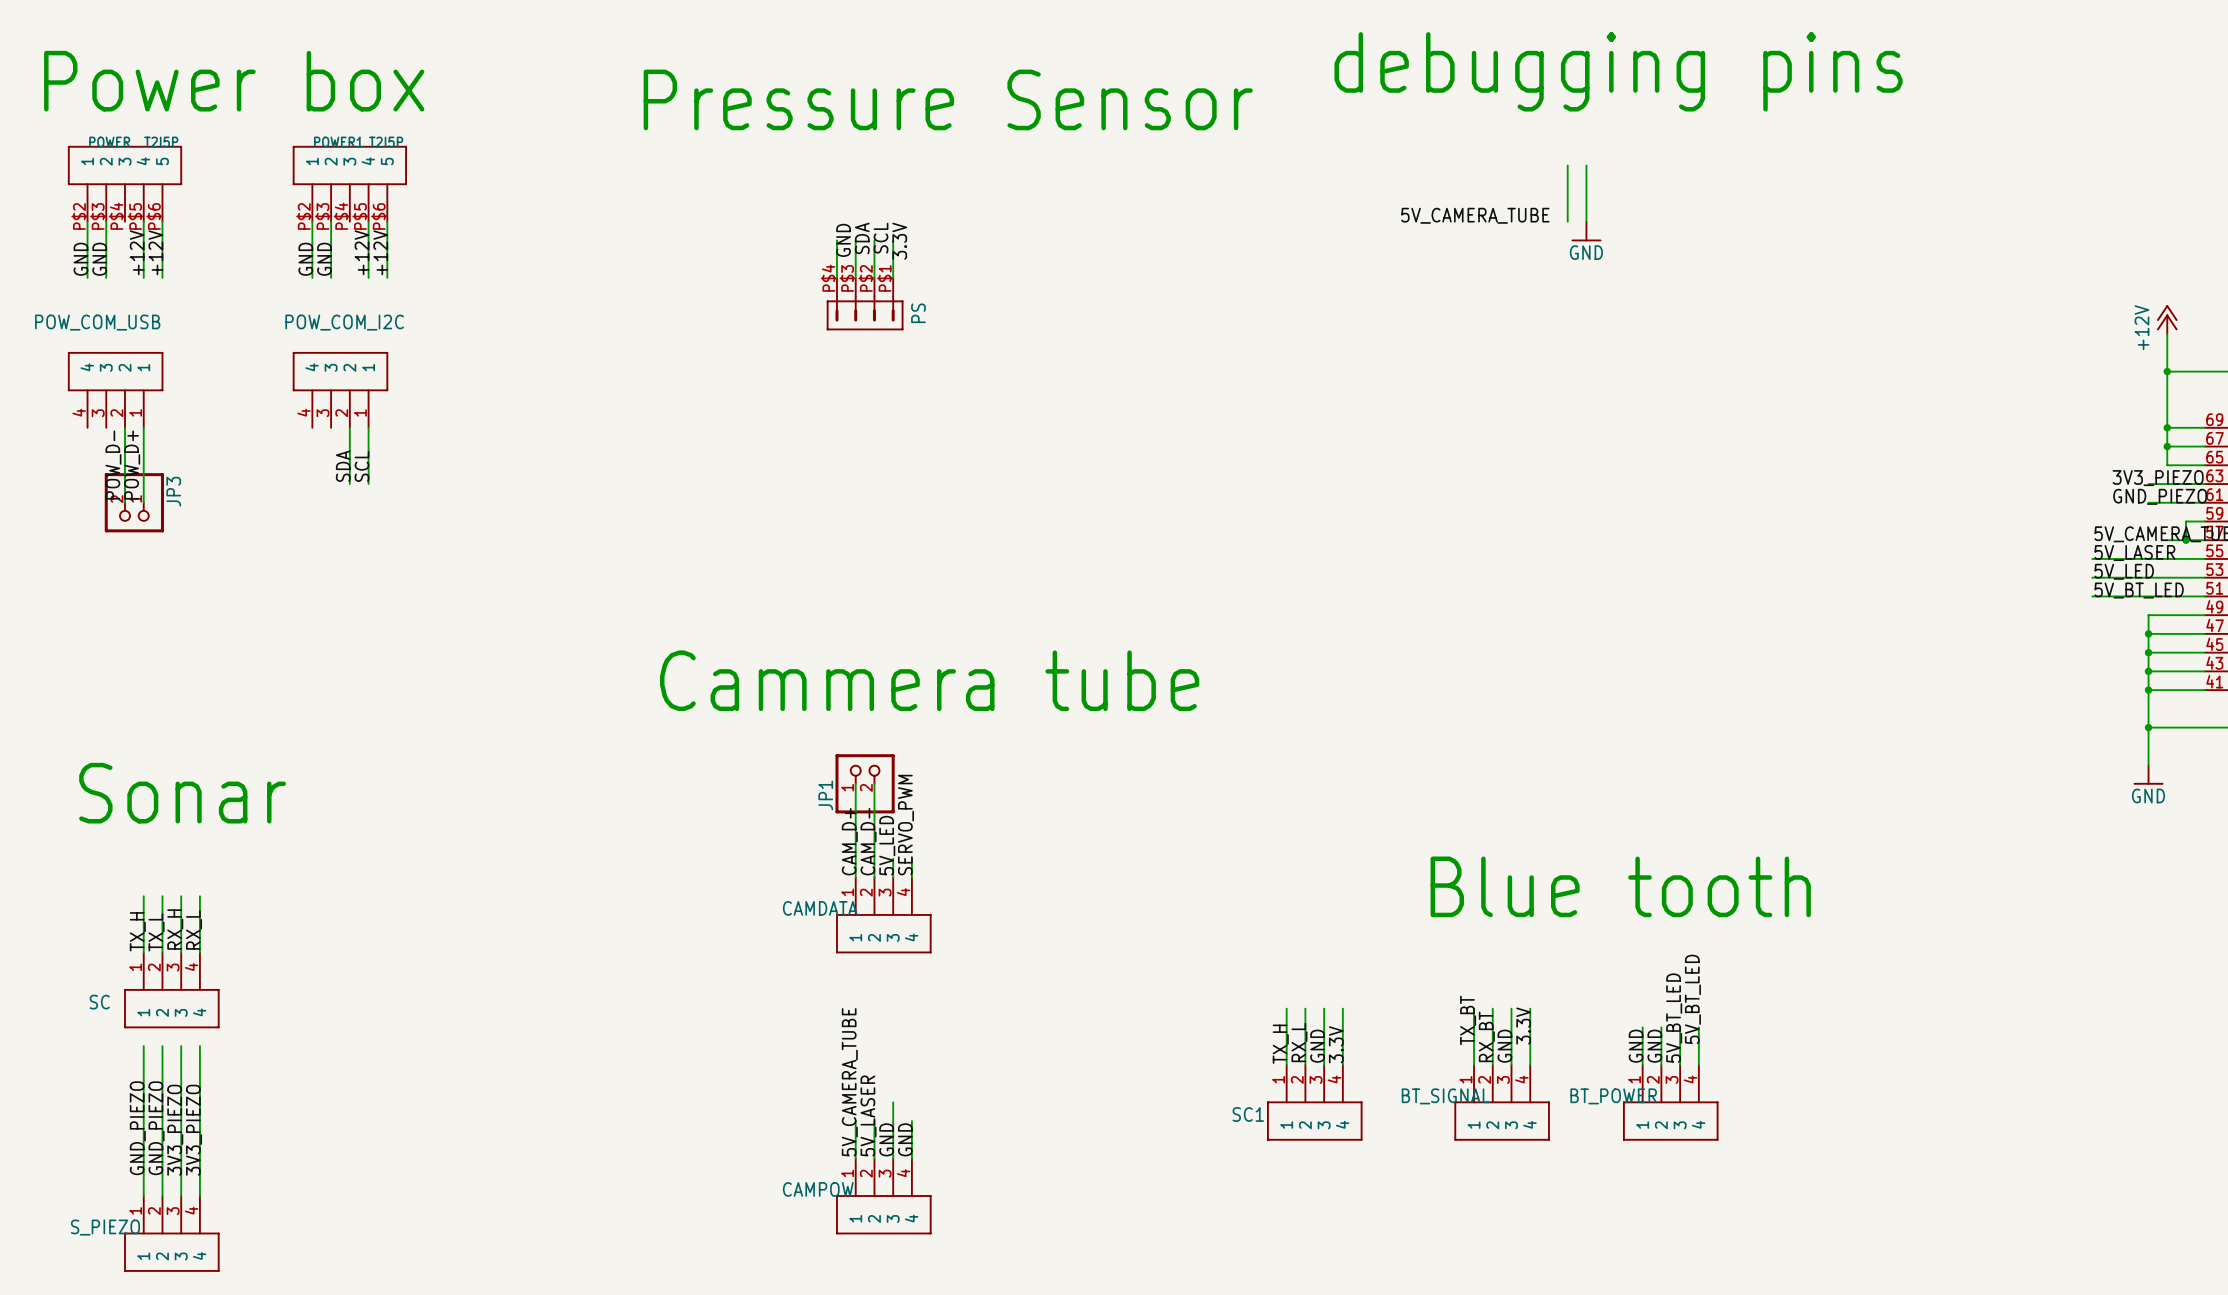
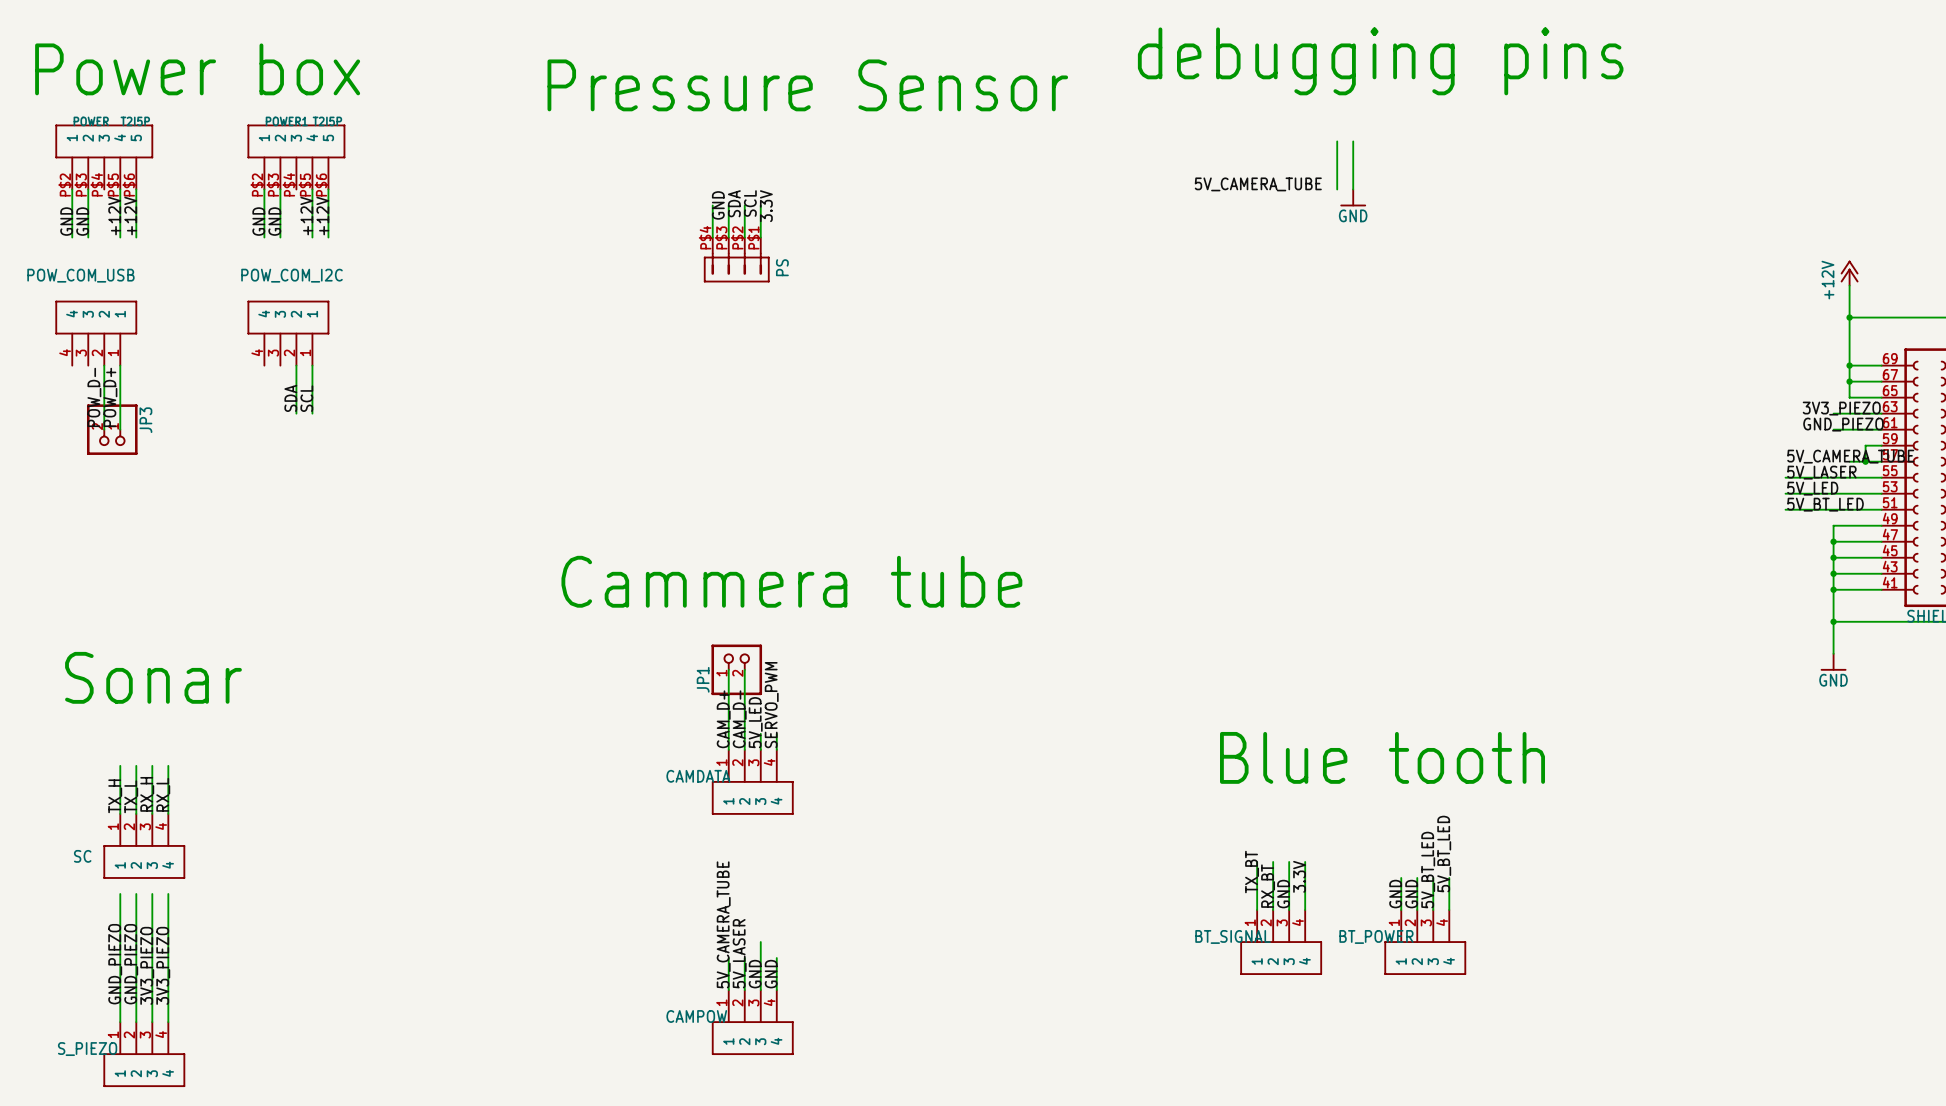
wire: (1286, 1008) (1286, 1064) -> none
wire: (1305, 1008) (1305, 1064) -> none
wire: (1324, 1008) (1324, 1064) -> none
wire: (1342, 1008) (1342, 1064) -> none
label: RX_L (1299, 1042) -> none
label: TX_H (1280, 1044) -> none
label: 3.3V (1336, 1044) -> none
label: GND (1317, 1046) -> none
SC1: (1314, 1102) -> none

